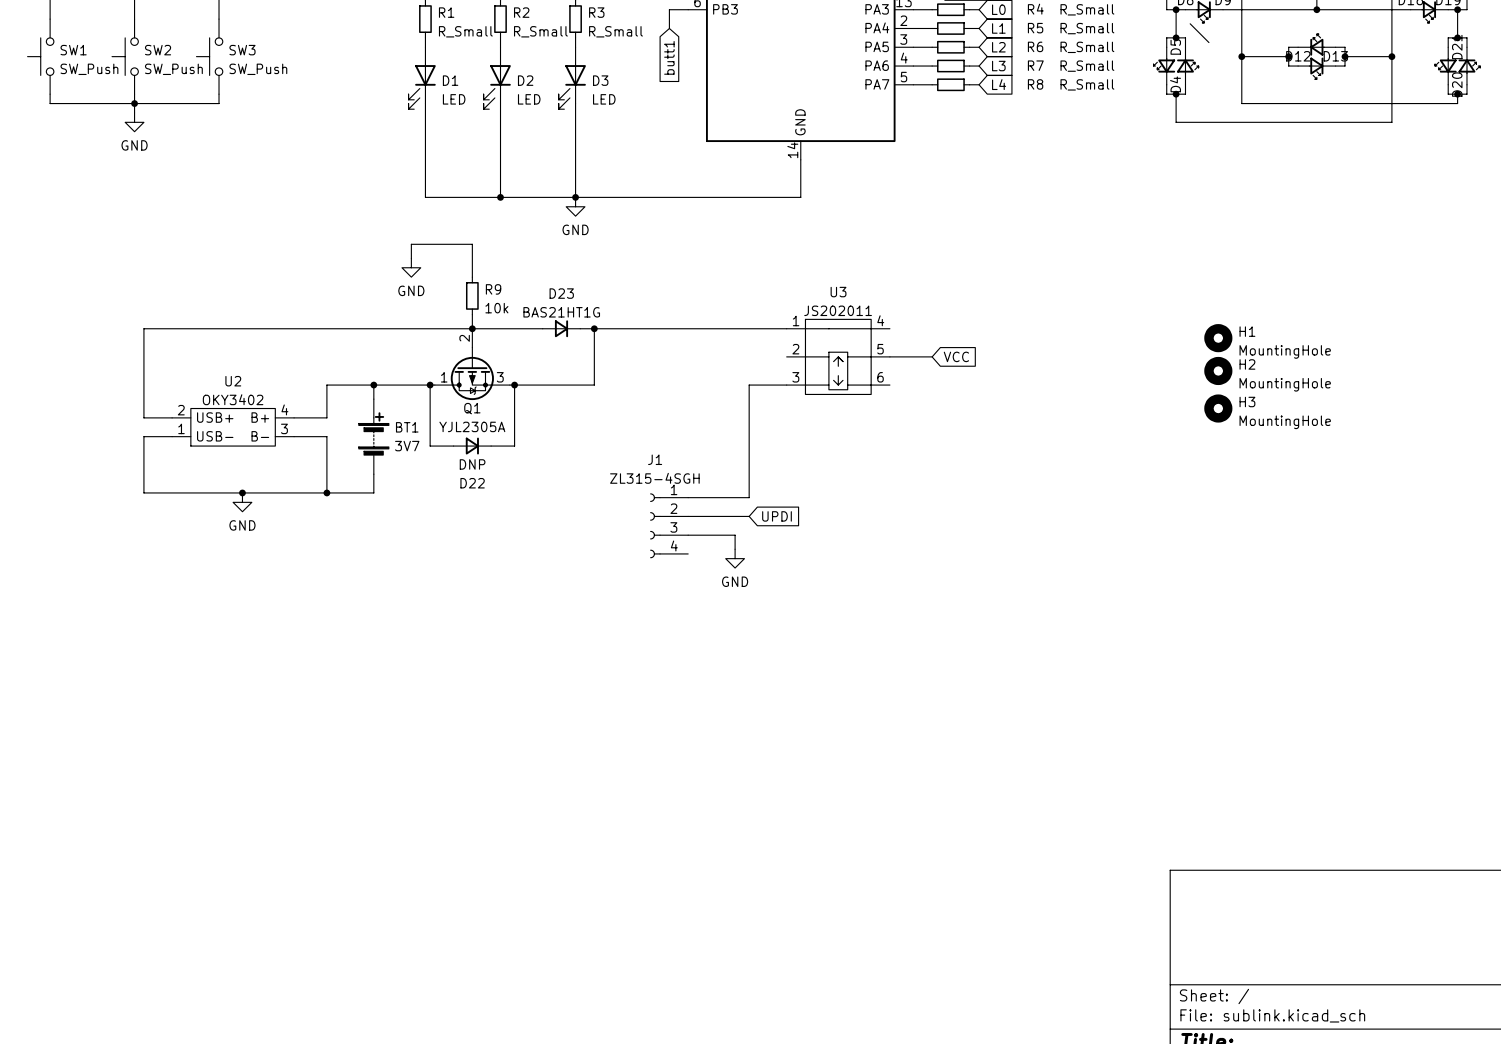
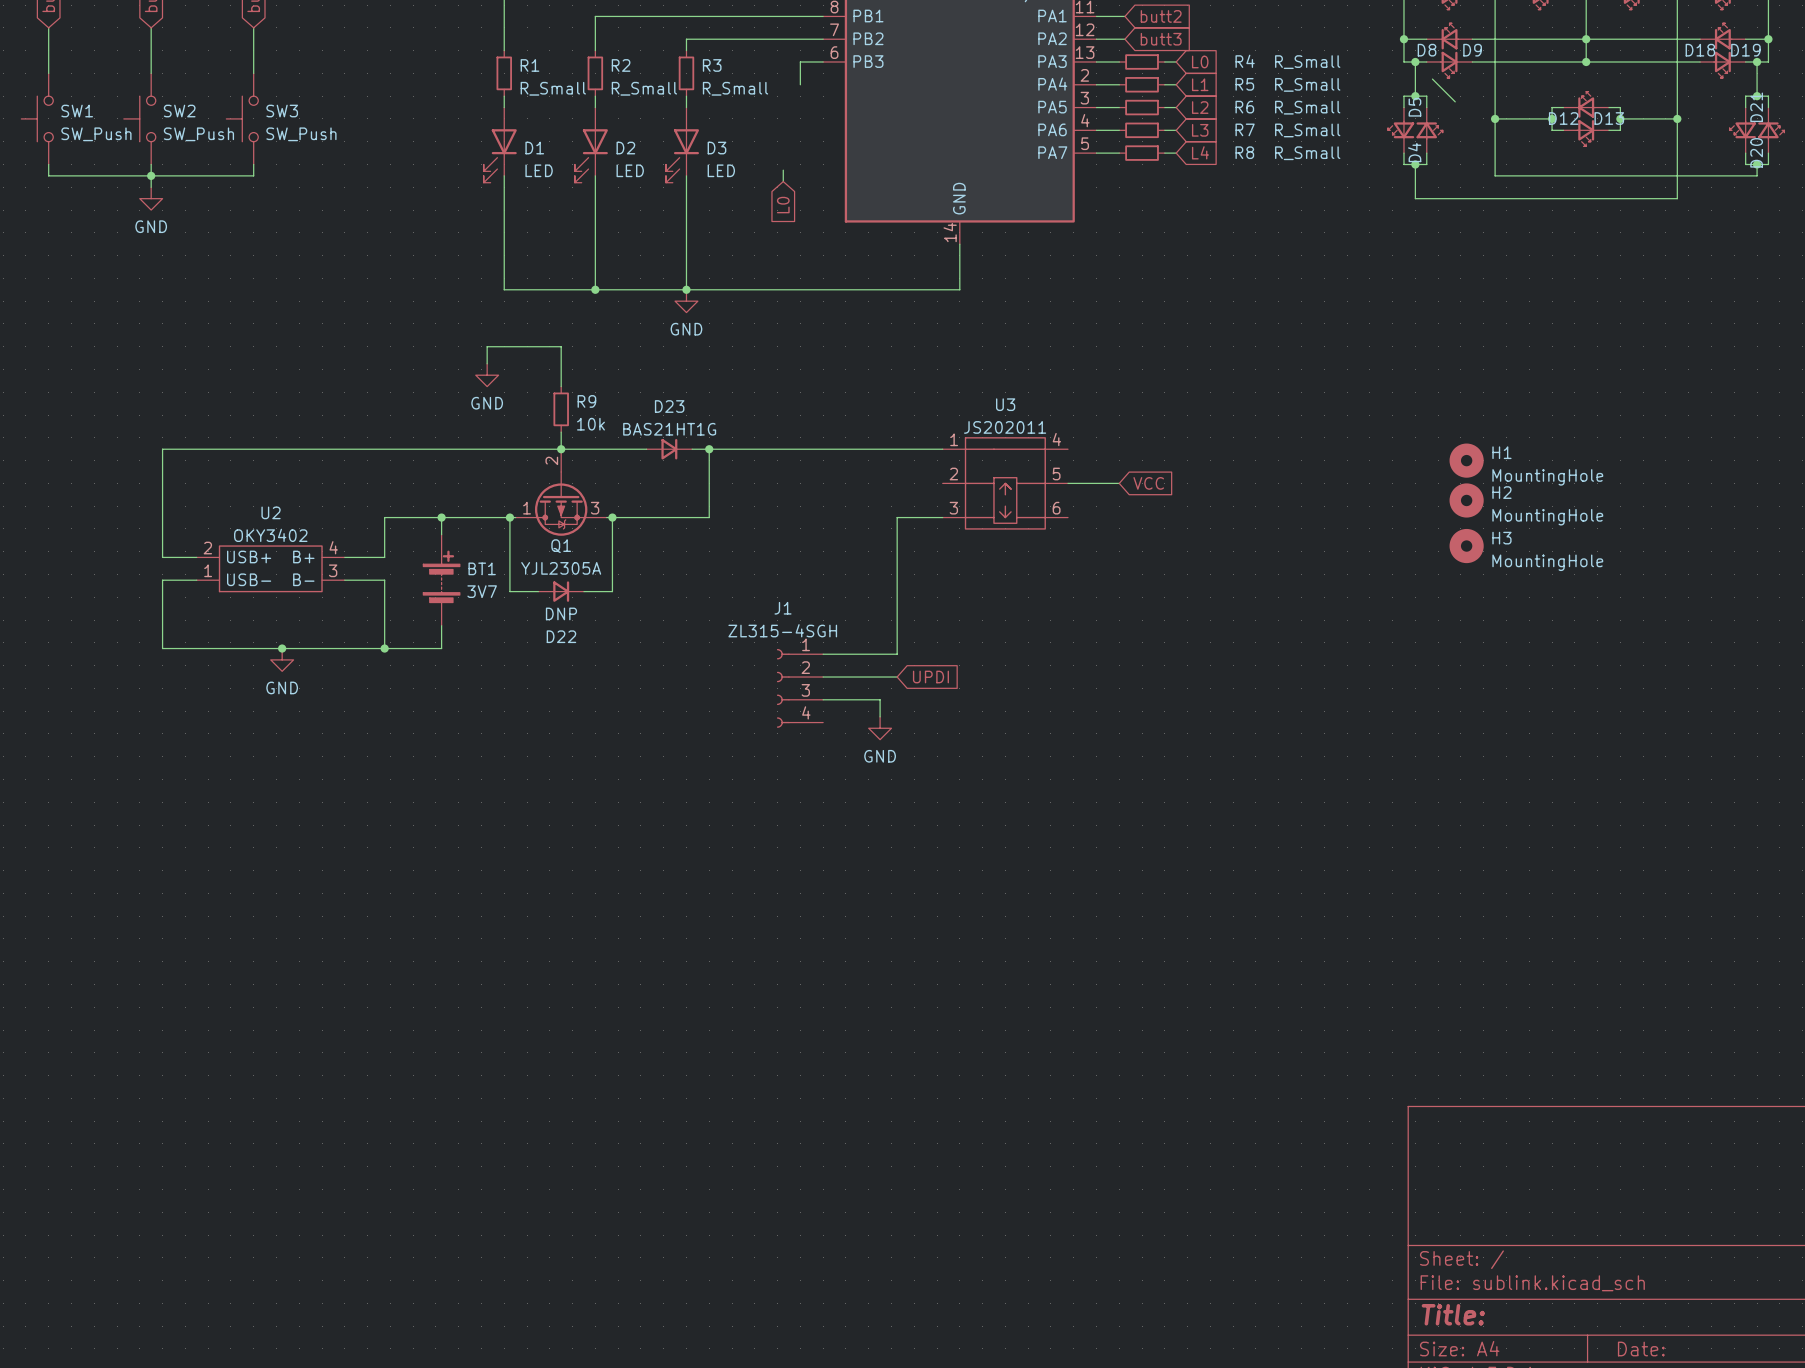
global label: butt1 (669, 57) -> none
wire: none -> (783, 170) (783, 181)
global label: none -> L0 (783, 205)

